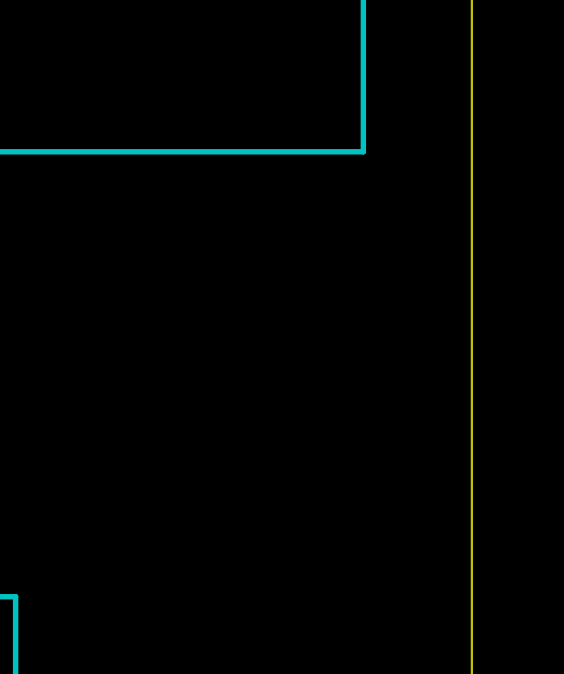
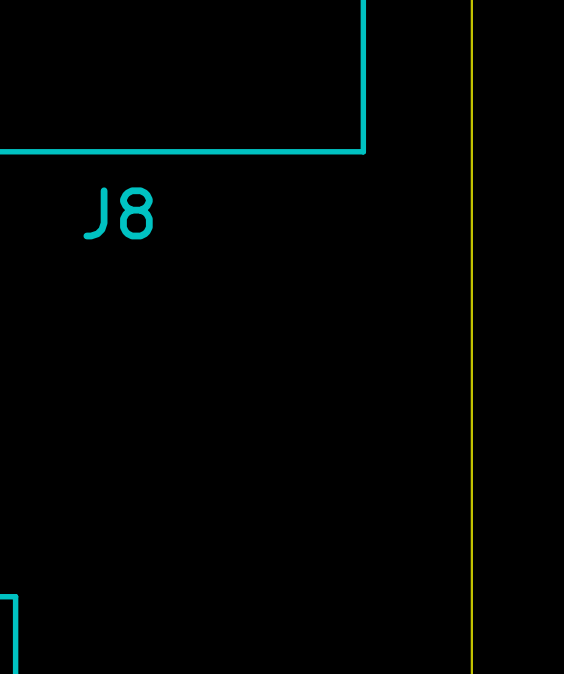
J8 name: none -> J8 (118, 213)

